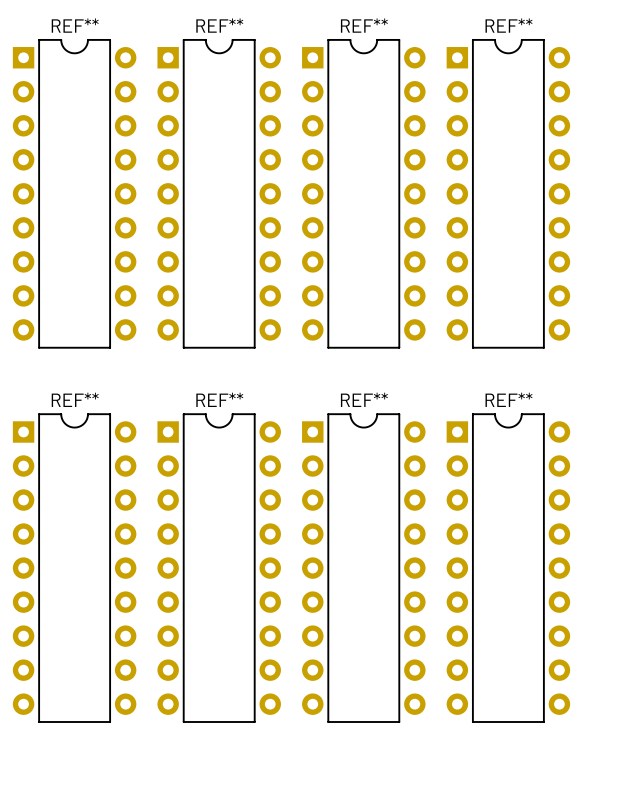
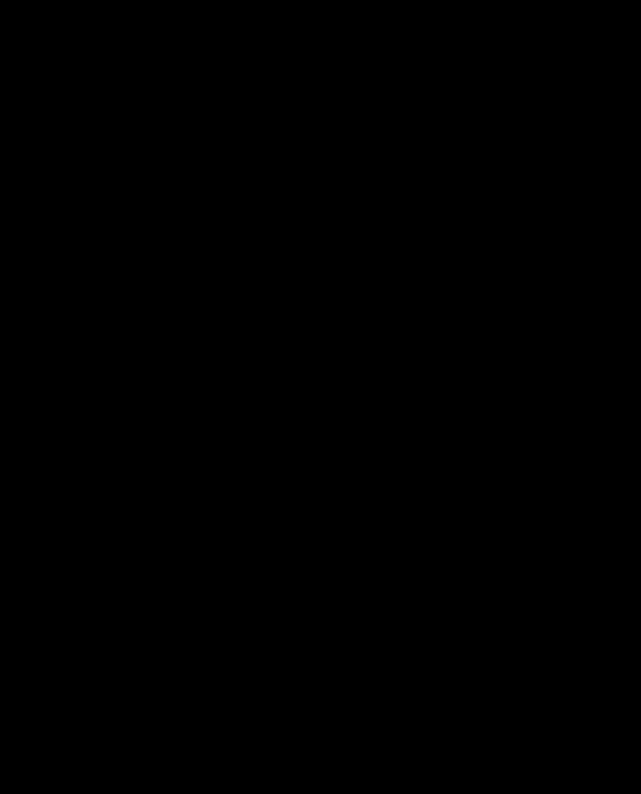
REF**: (74, 193) -> none
REF**: (219, 193) -> none
REF**: (363, 193) -> none
REF**: (508, 193) -> none
REF**: (74, 568) -> none
REF**: (219, 568) -> none
REF**: (363, 568) -> none
REF**: (508, 568) -> none

